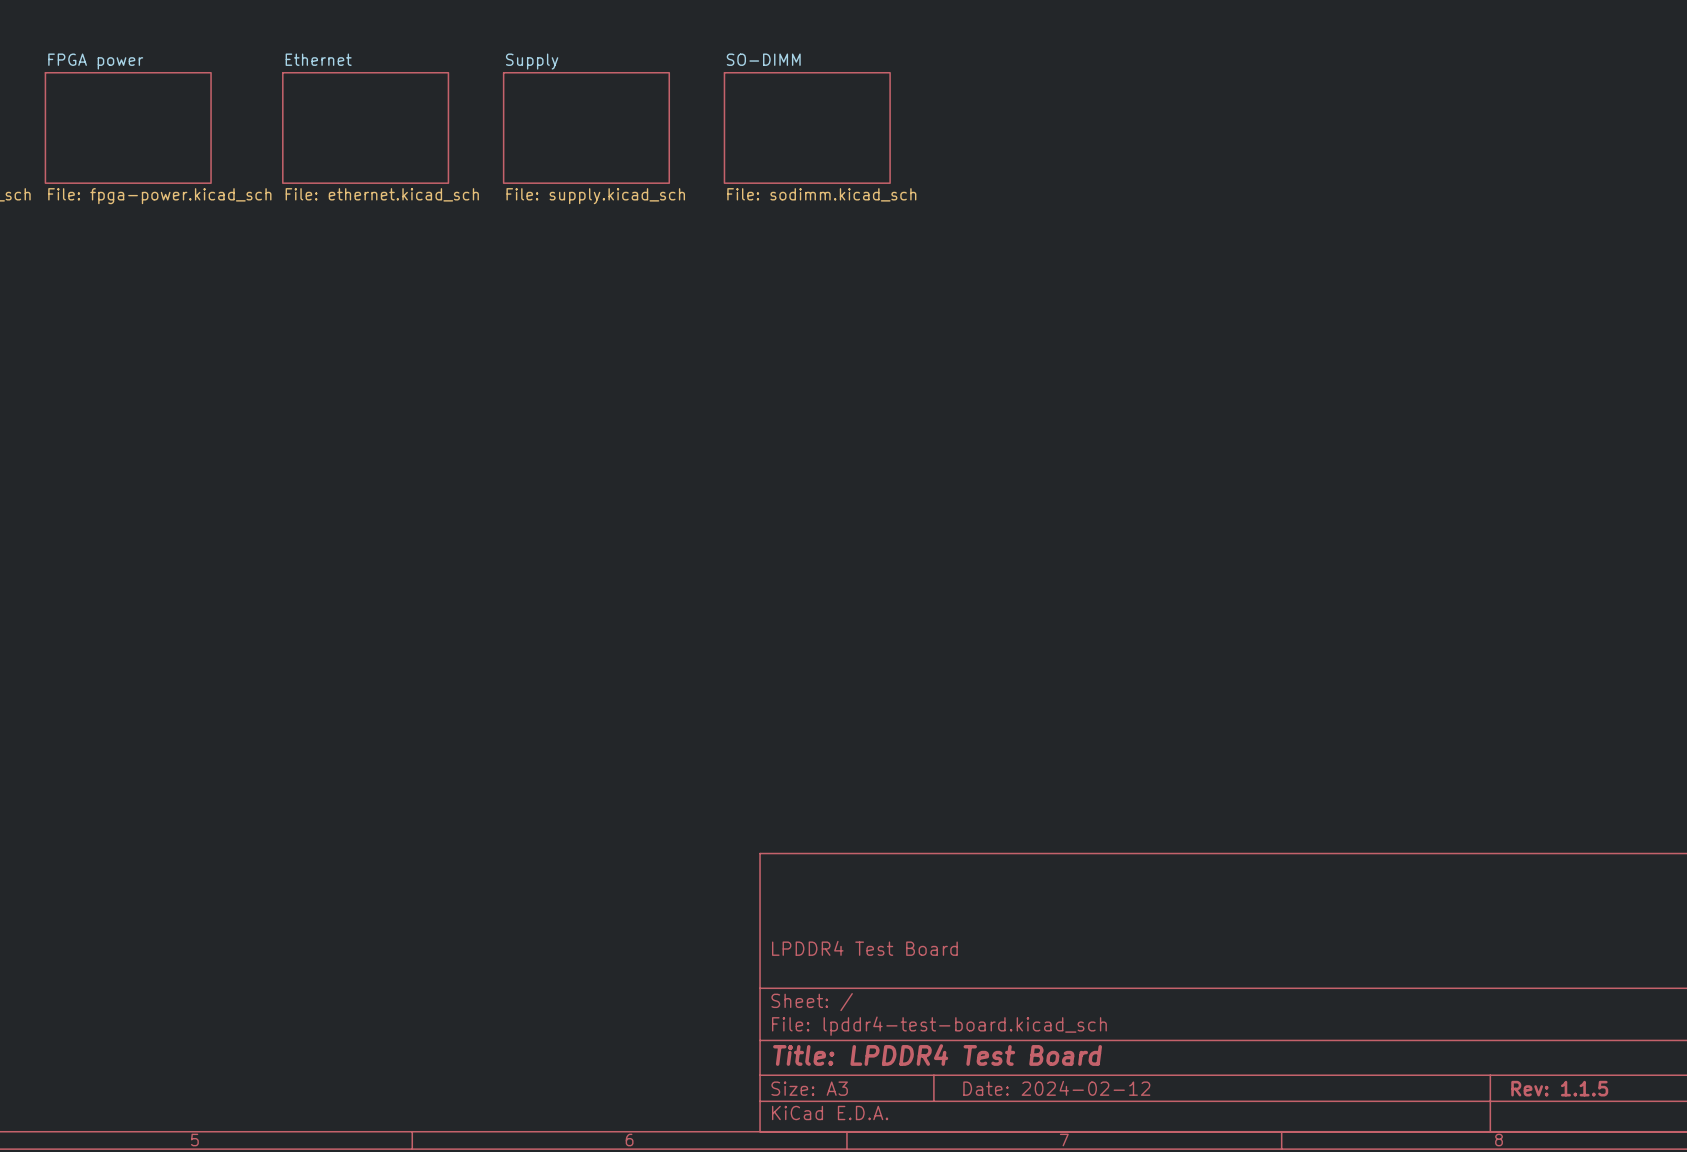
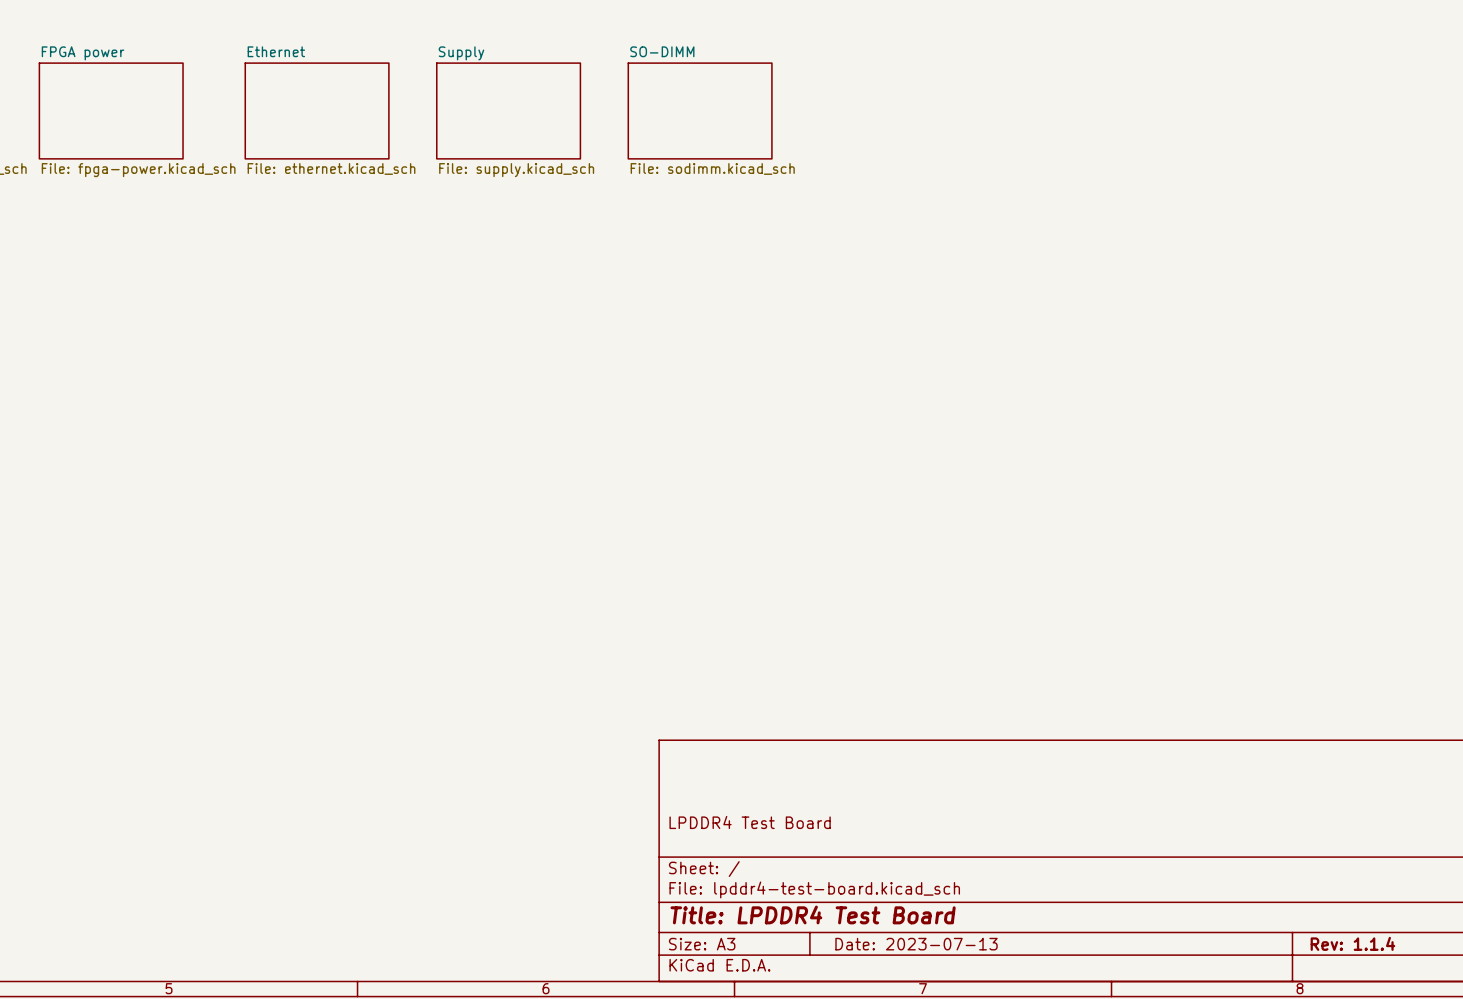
title block: Date: 2024-02-12 (1056, 1088) -> Date: 2023-07-13 (916, 944)
title block: Rev: 1.1.5 (1559, 1088) -> Rev: 1.1.4 (1352, 943)

